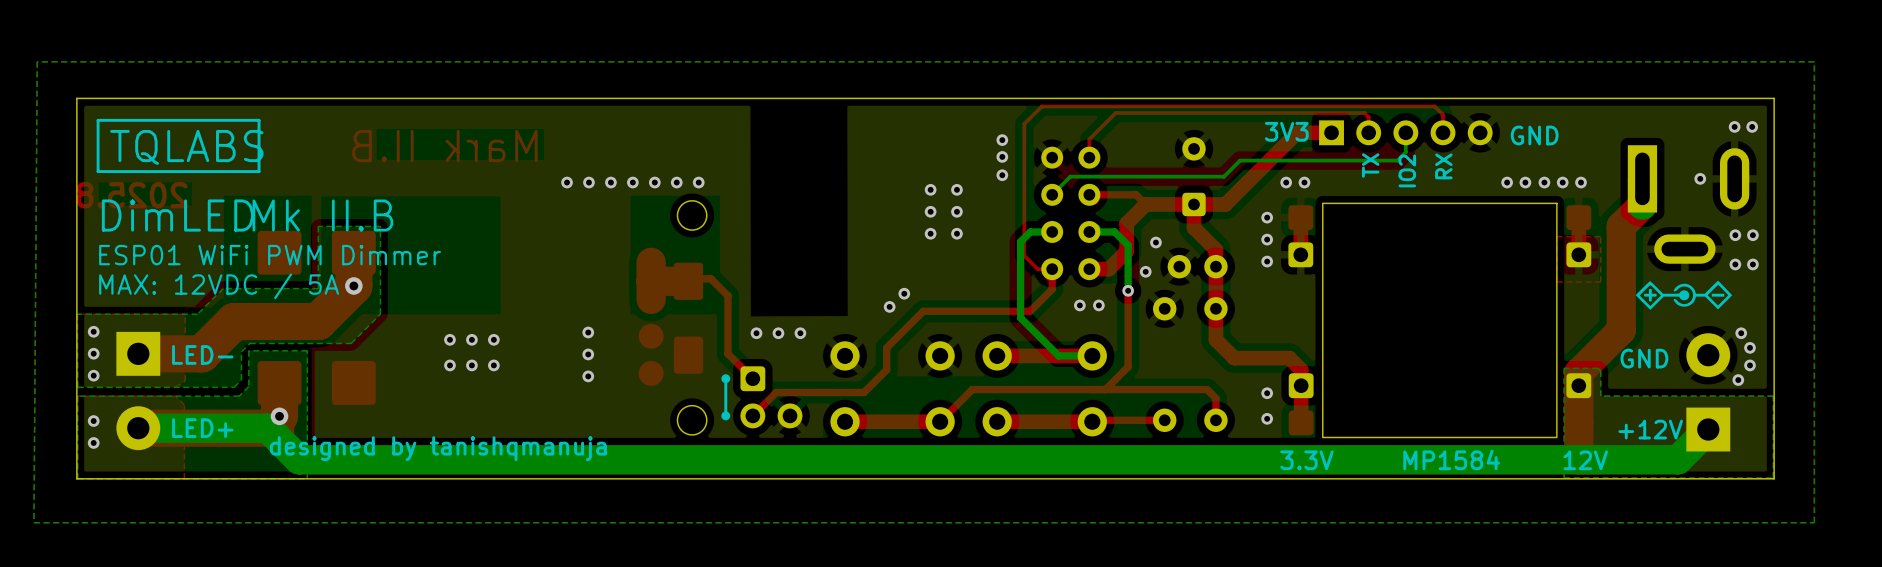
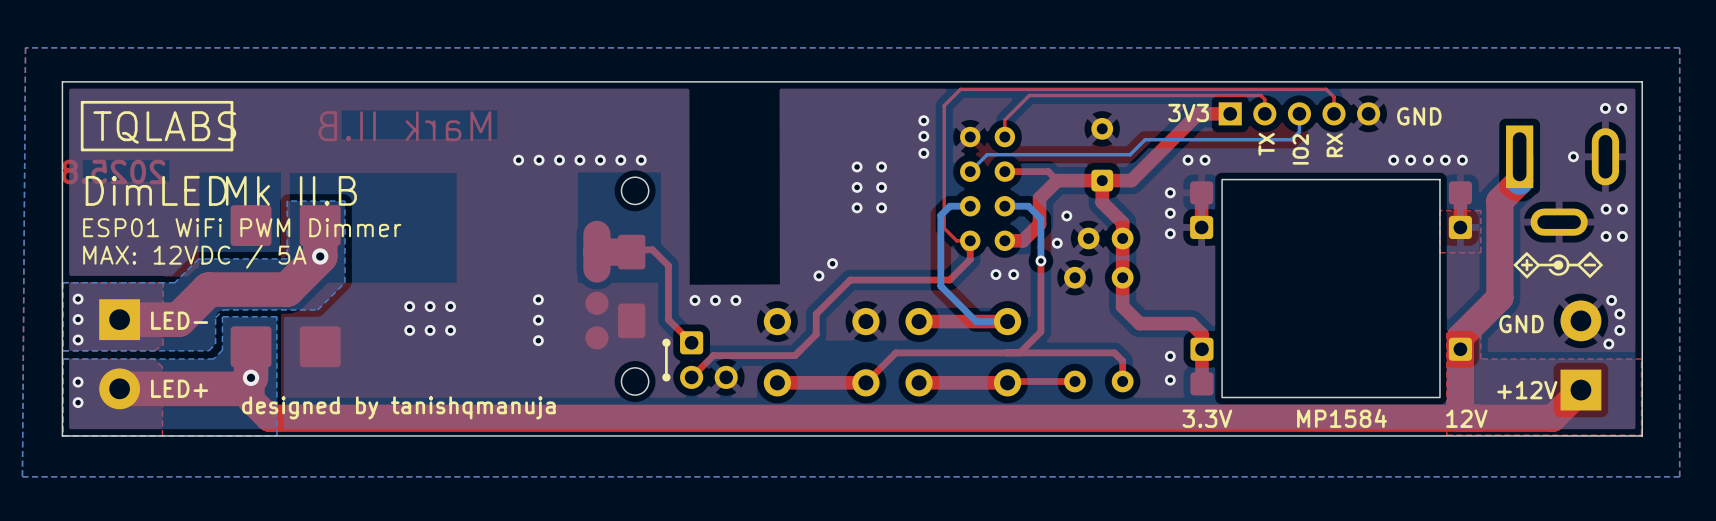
bottom zone outline: (1598, 368) (1600, 370) (1600, 396) (1773, 396) (1773, 478) (1564, 478) (1564, 368) (1598, 368) -> none
bottom track: (138, 428) (267, 428) (299, 459) (1678, 459) (1708, 429) -> none

